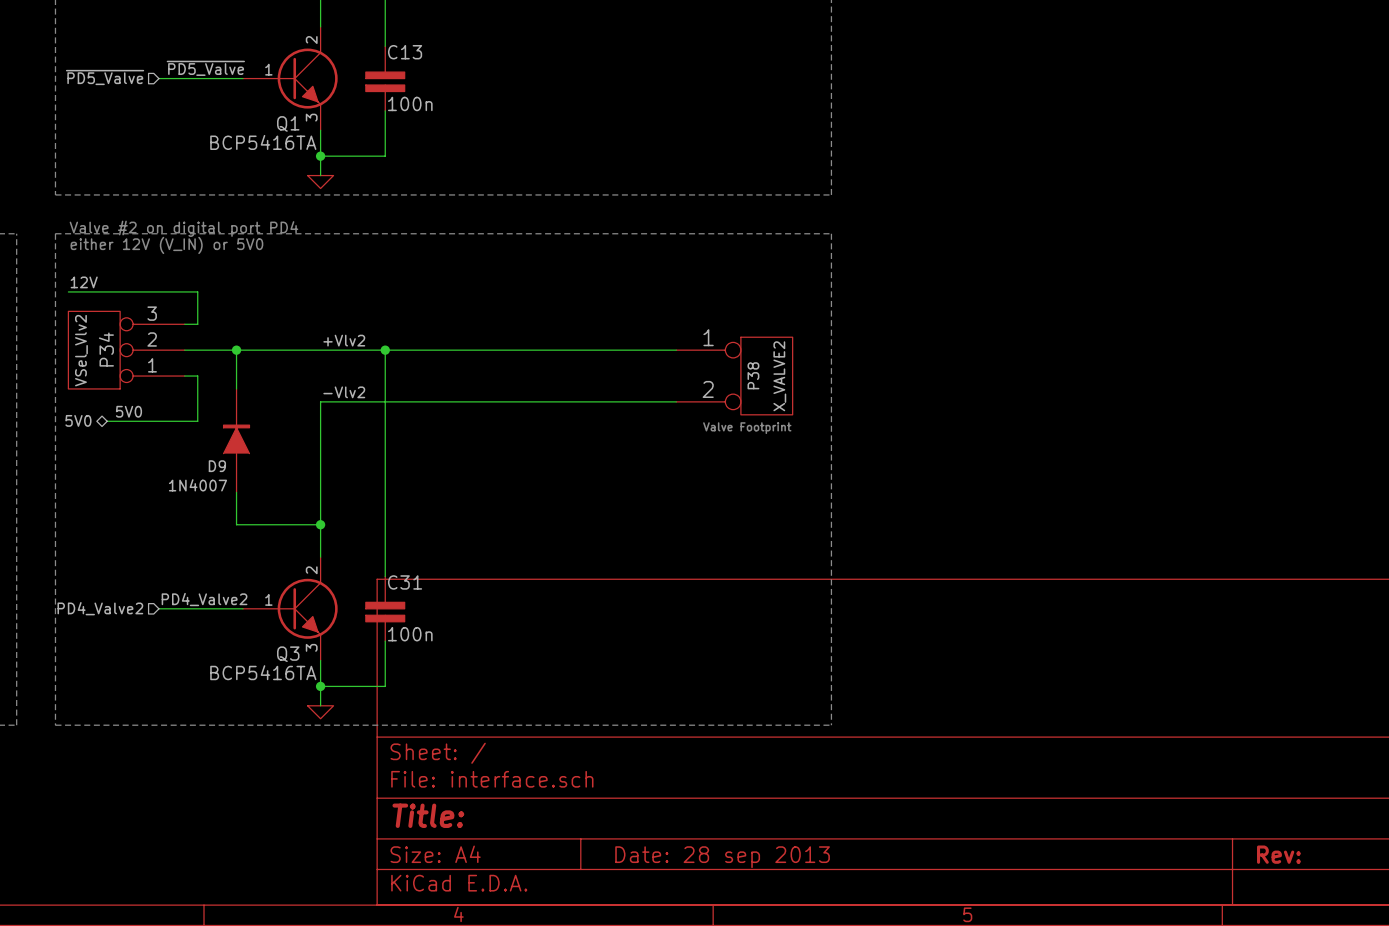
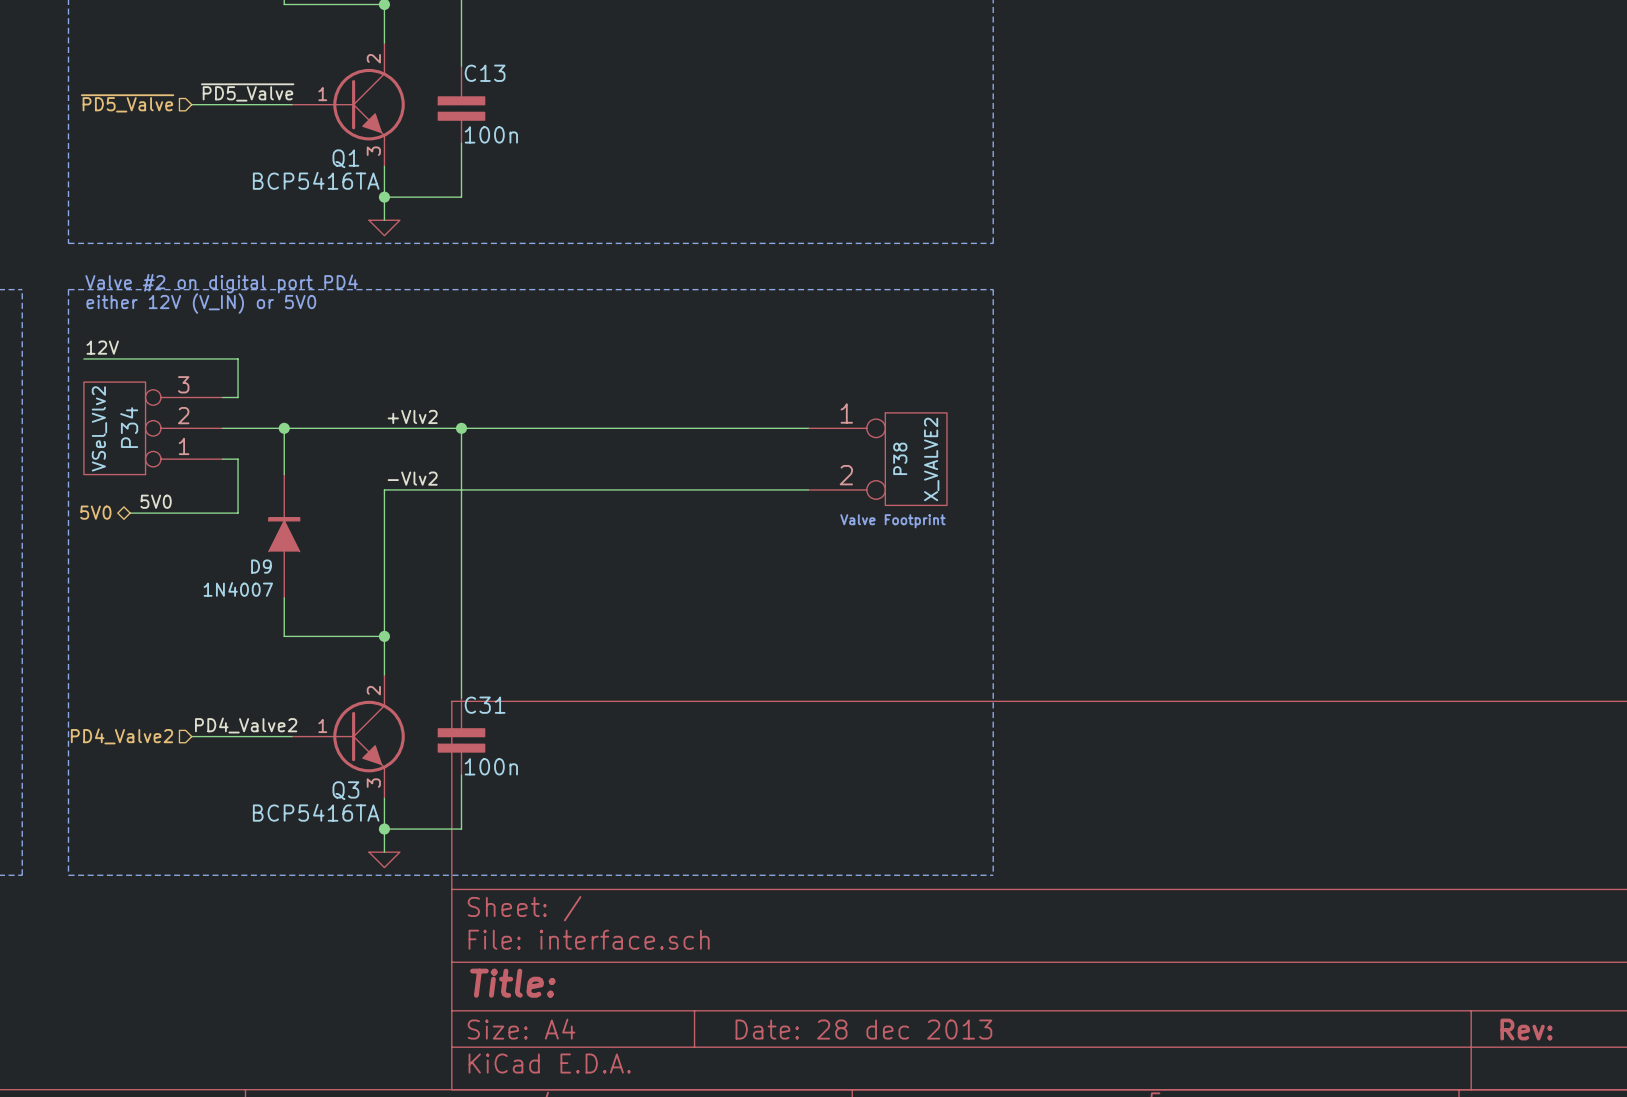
title block: Date: 28 sep 2013 (722, 857) -> Date: 28 dec 2013 (863, 1029)

